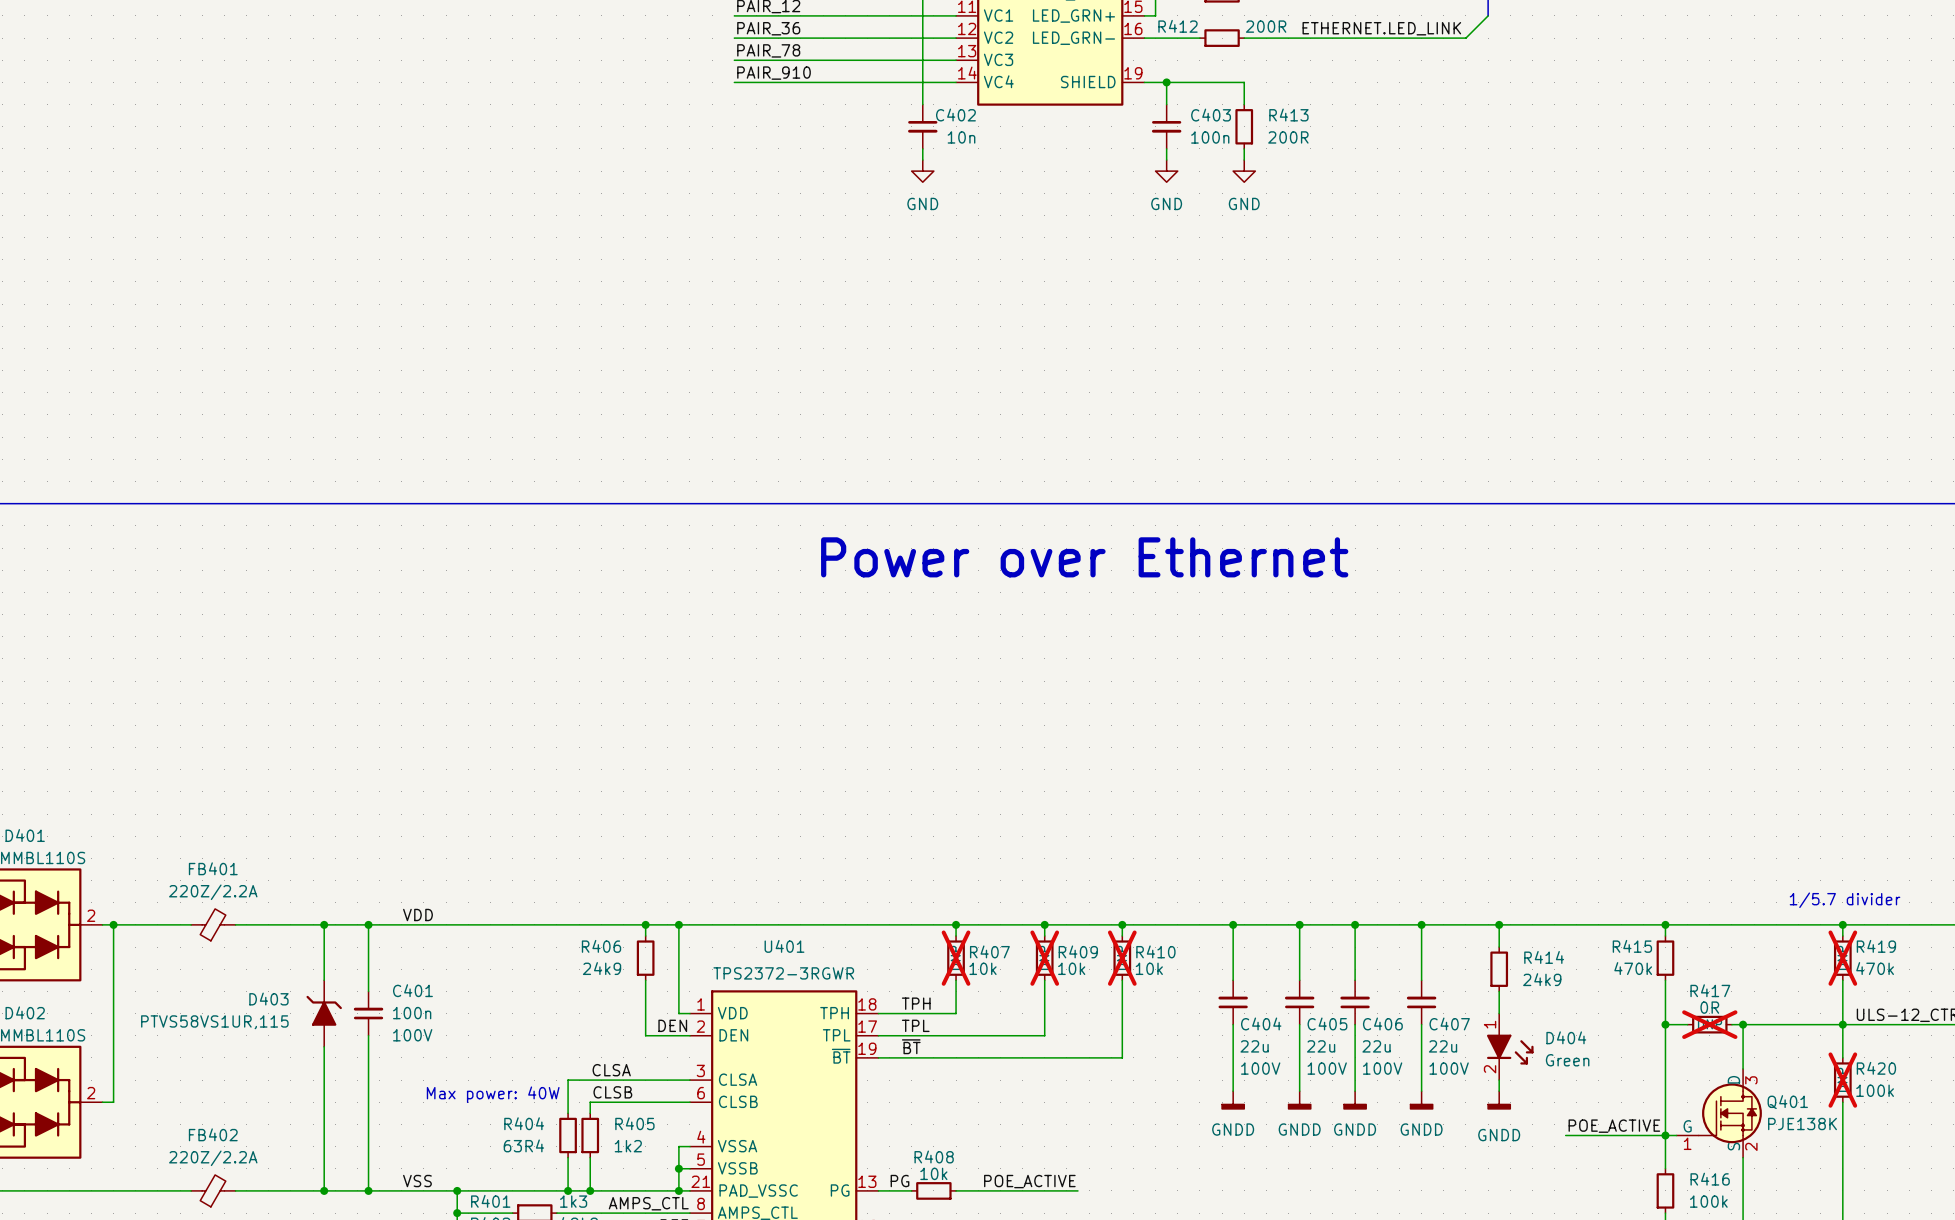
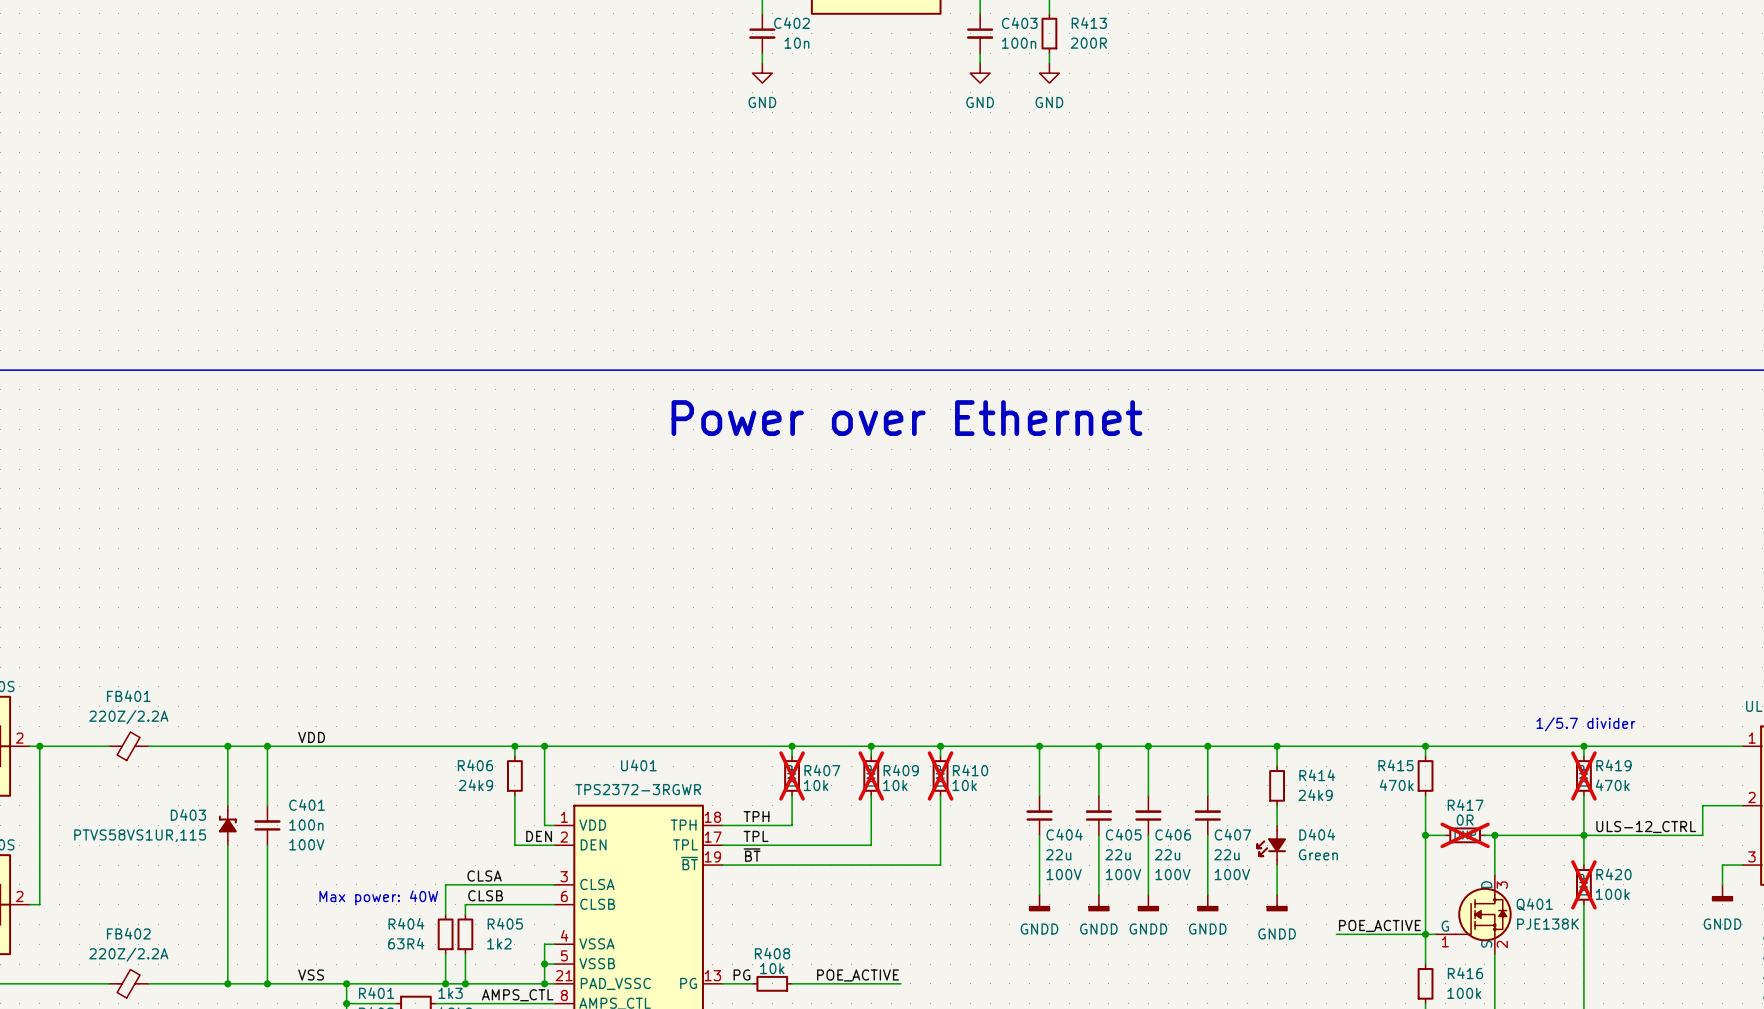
D403 symbol: [306, 980, 342, 1047] -> [218, 805, 237, 846]
D404 symbol: [1487, 1013, 1534, 1081] -> [1256, 825, 1286, 866]

